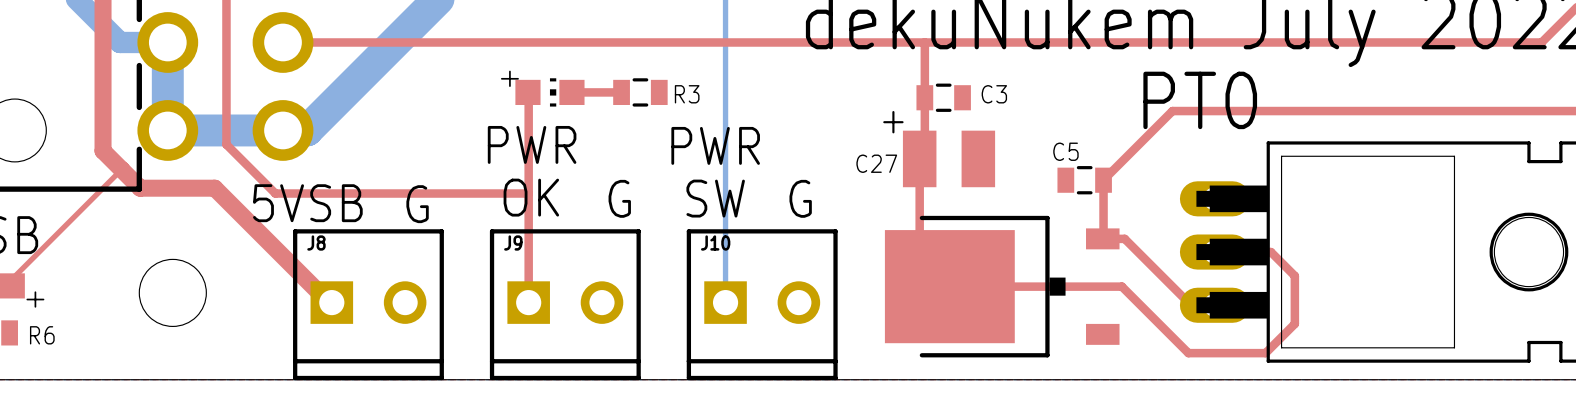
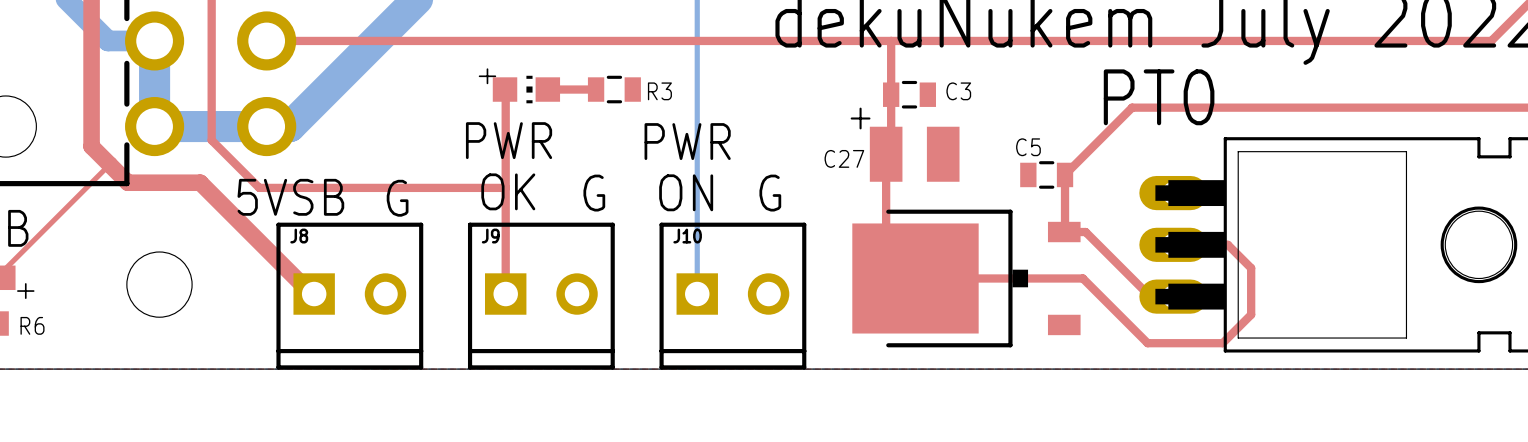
text: SW (715, 198) -> ON (686, 192)

